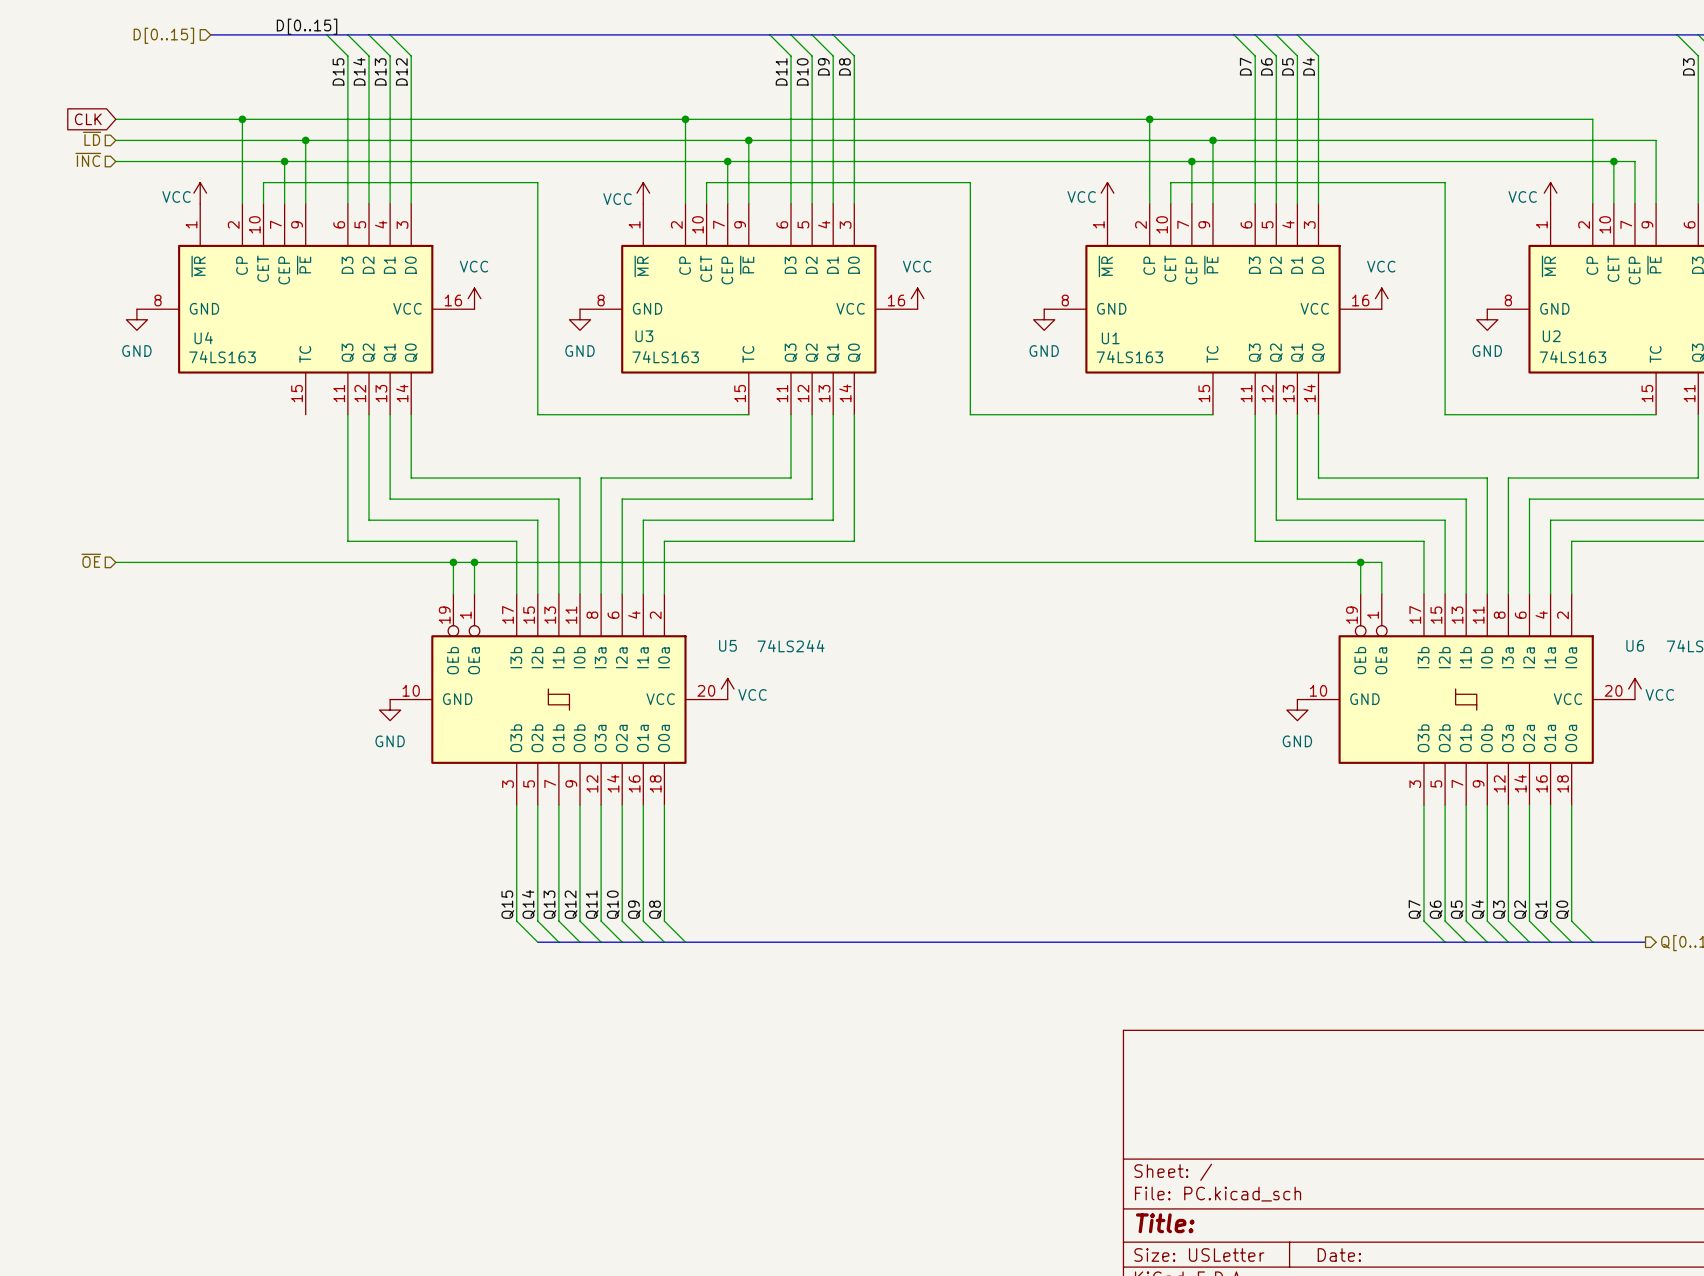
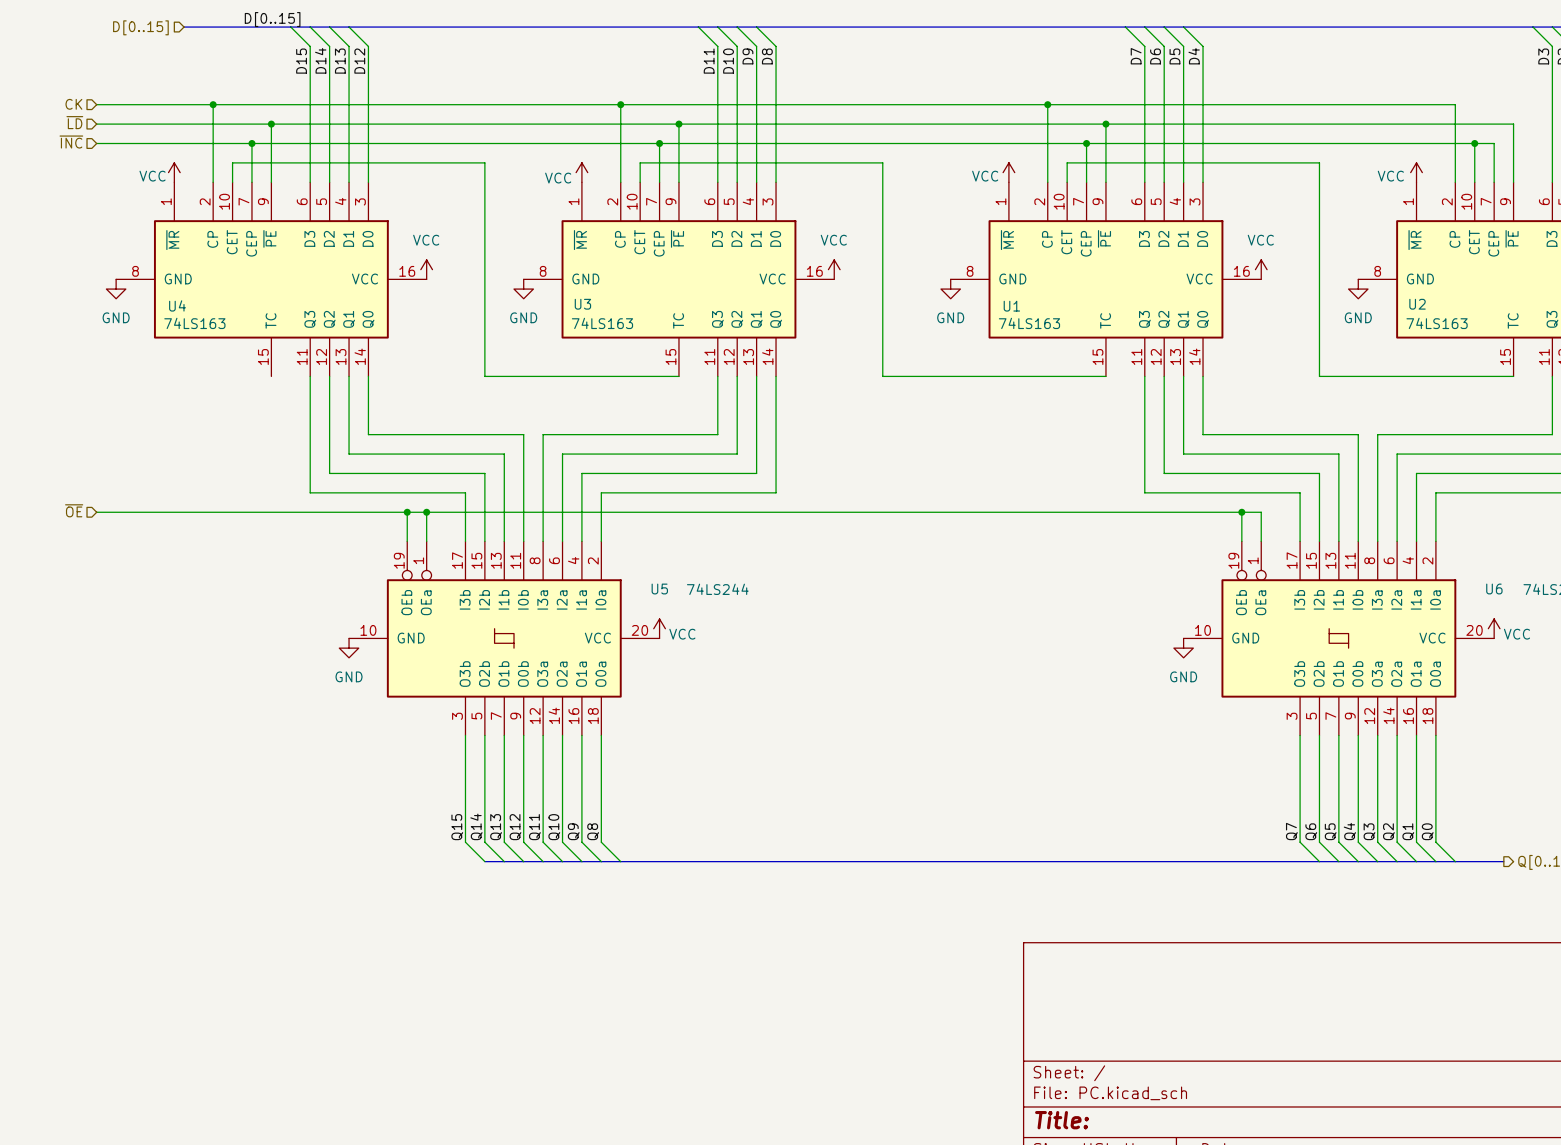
hierarchical label: none -> CK (73, 104)
global label: CLK (88, 119) -> none

